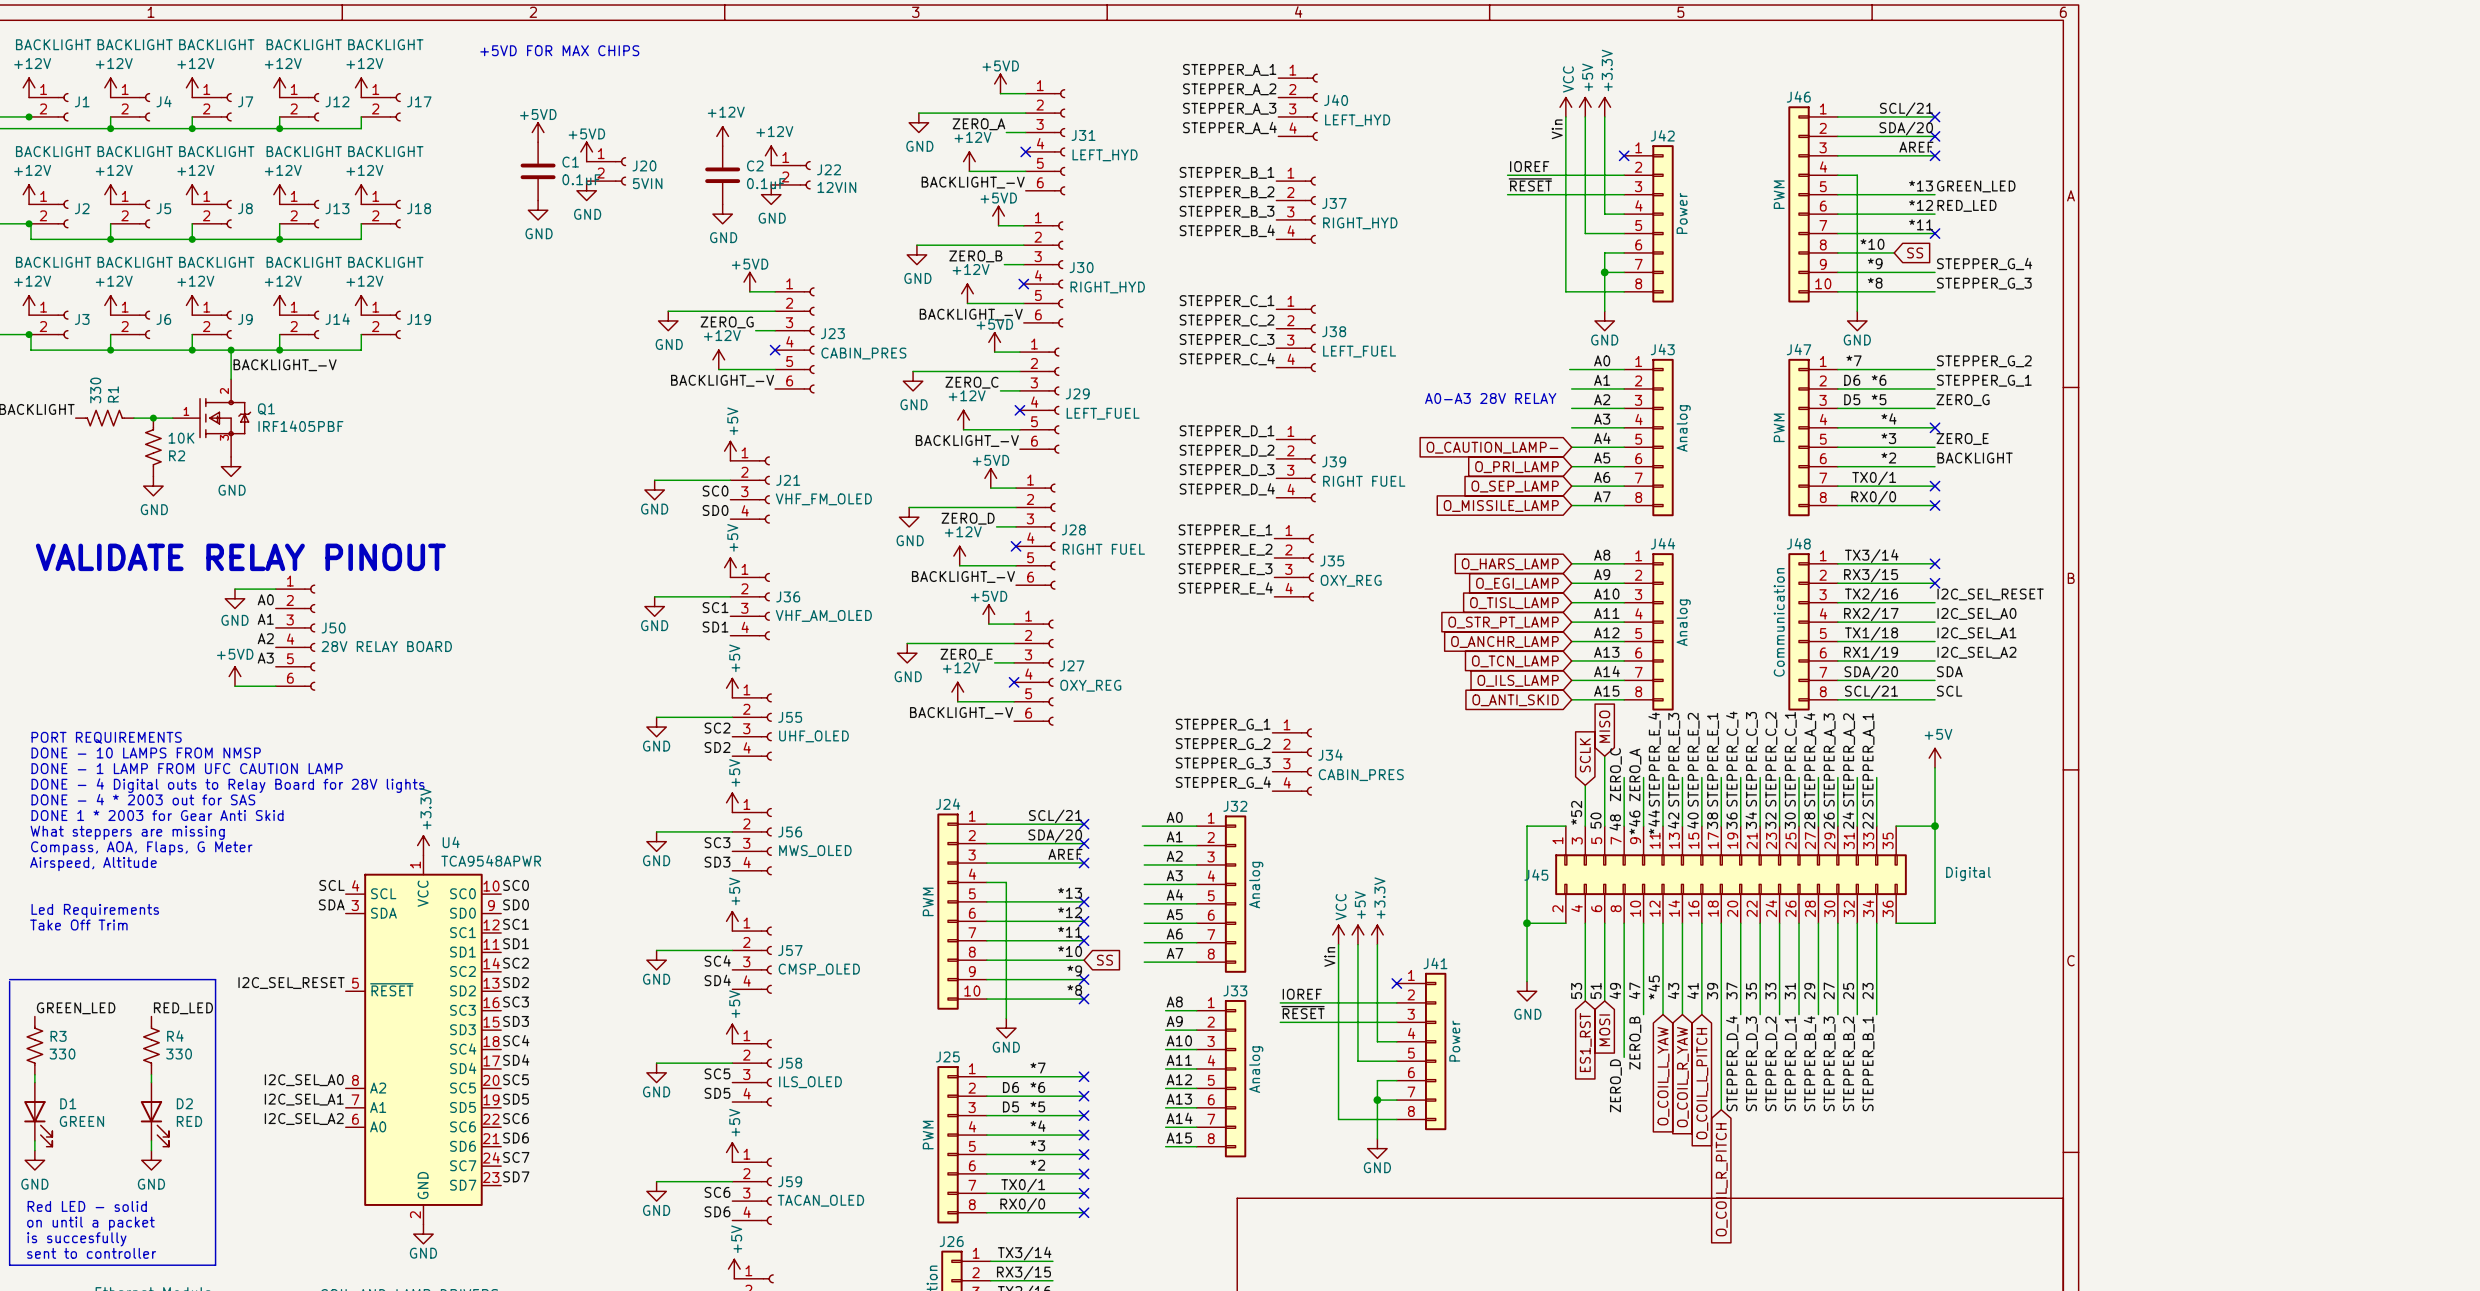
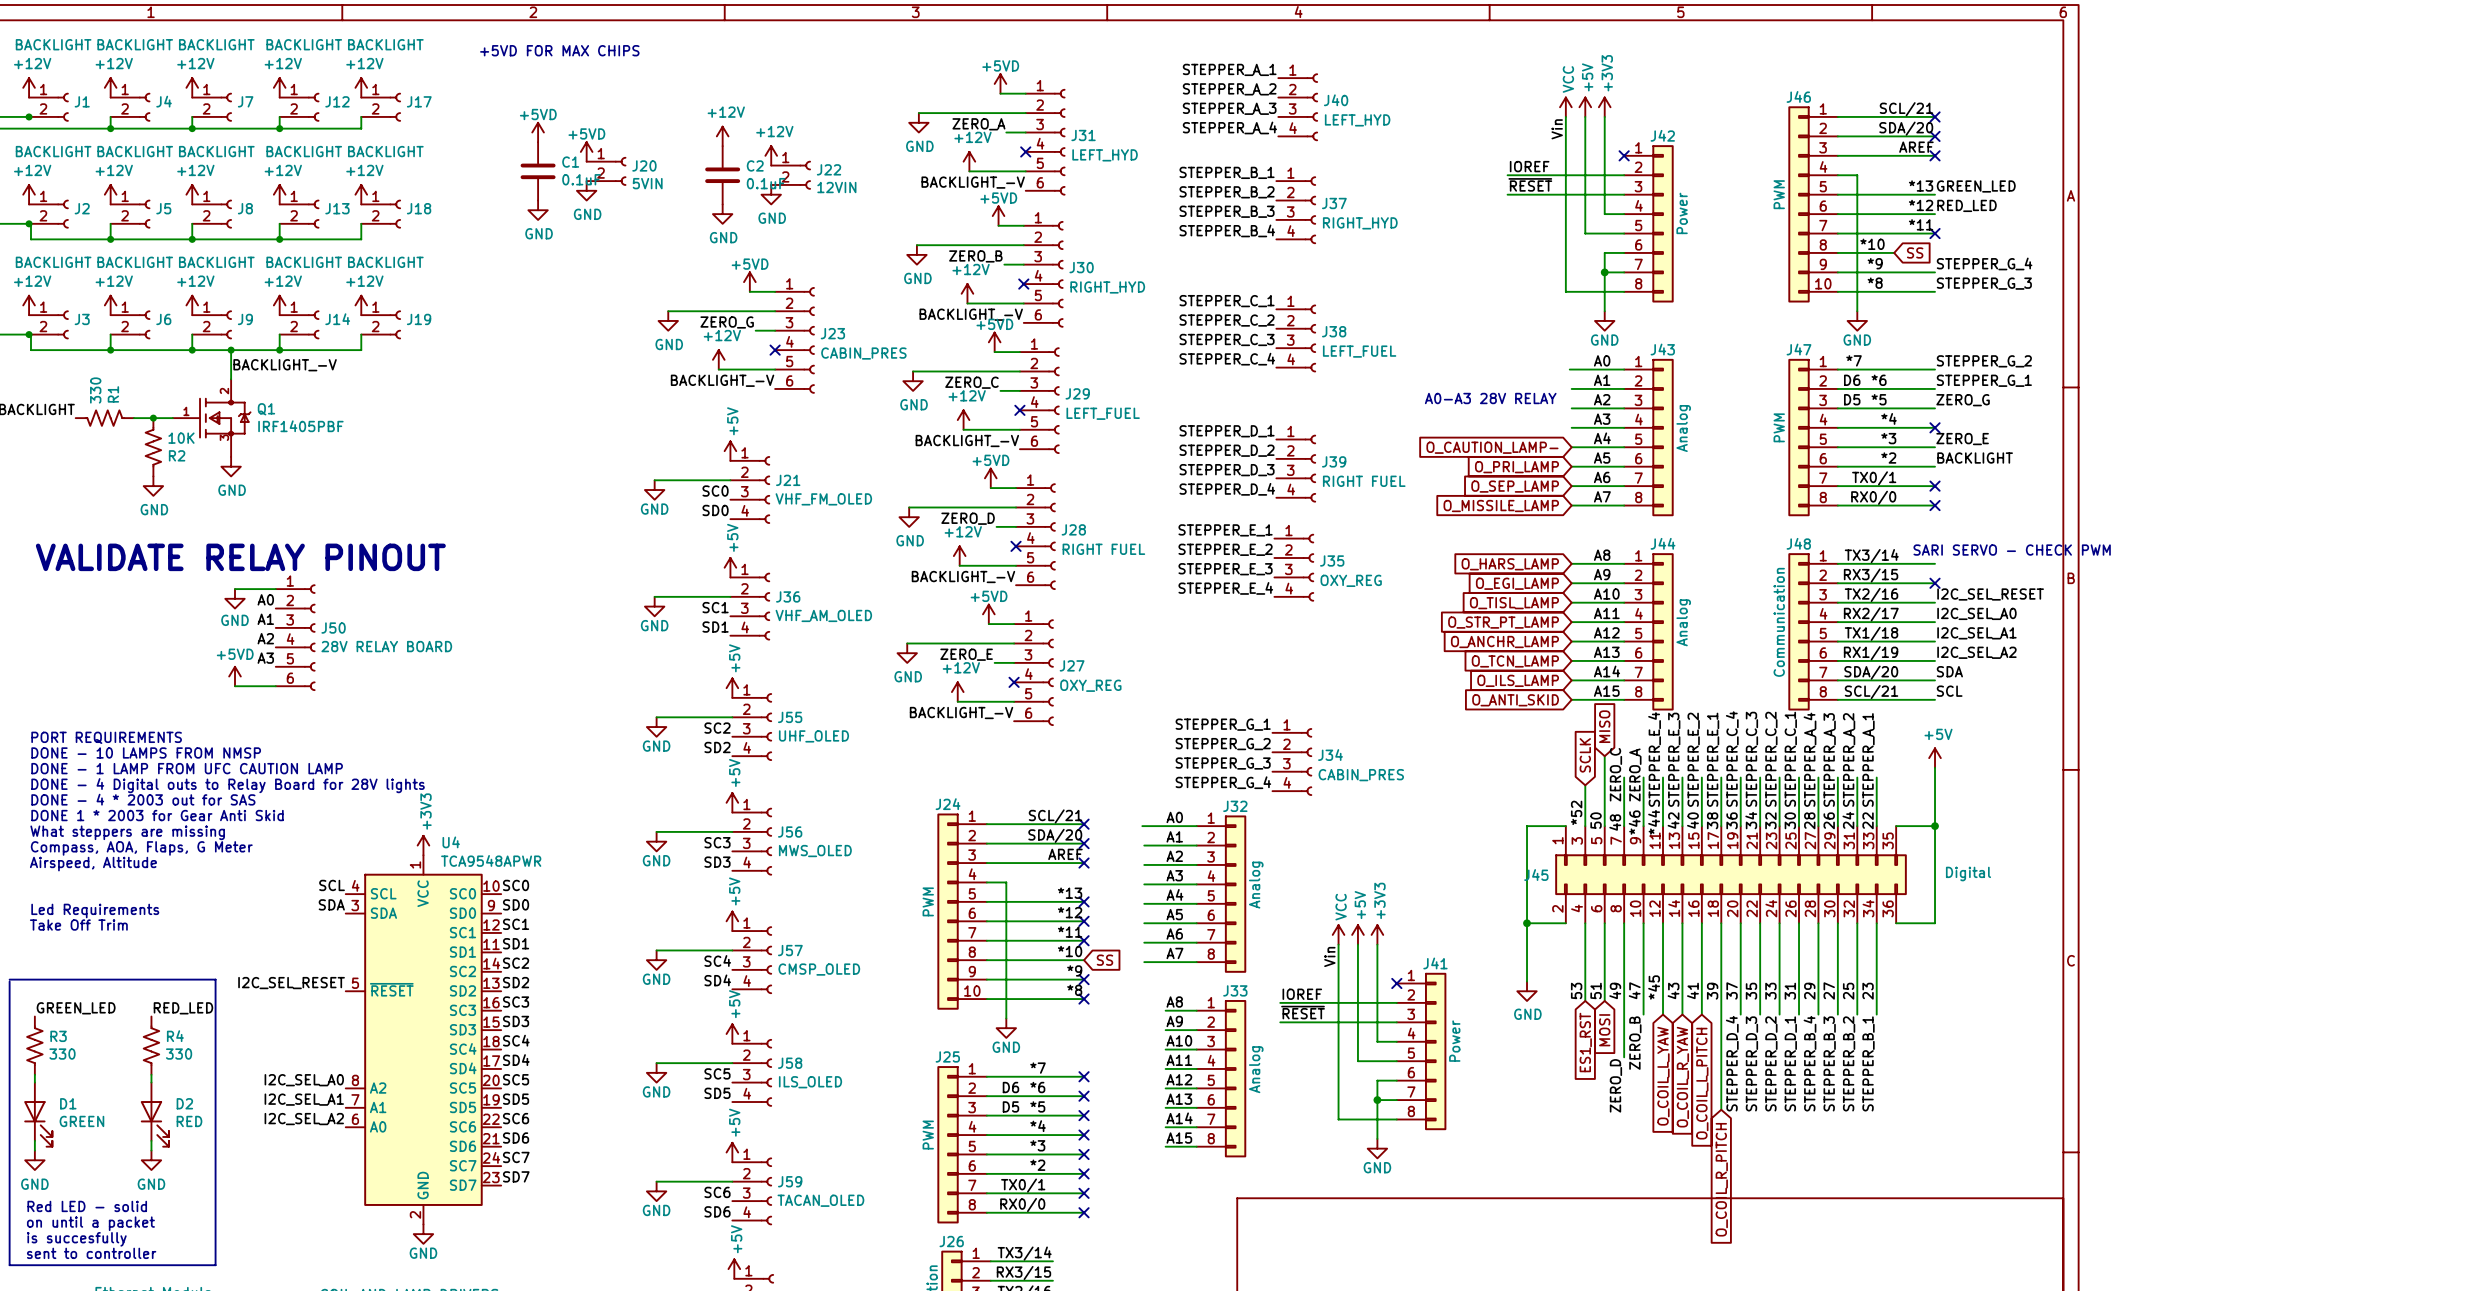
power symbol: +3.3V (1604, 107) -> +3V3 (1604, 107)
text: none -> SARI SERVO - CHECK PWM (2012, 550)
no-connect mark: (1935, 563) -> none
power symbol: +3.3V (423, 845) -> +3V3 (423, 845)
power symbol: +3.3V (1377, 934) -> +3V3 (1377, 934)

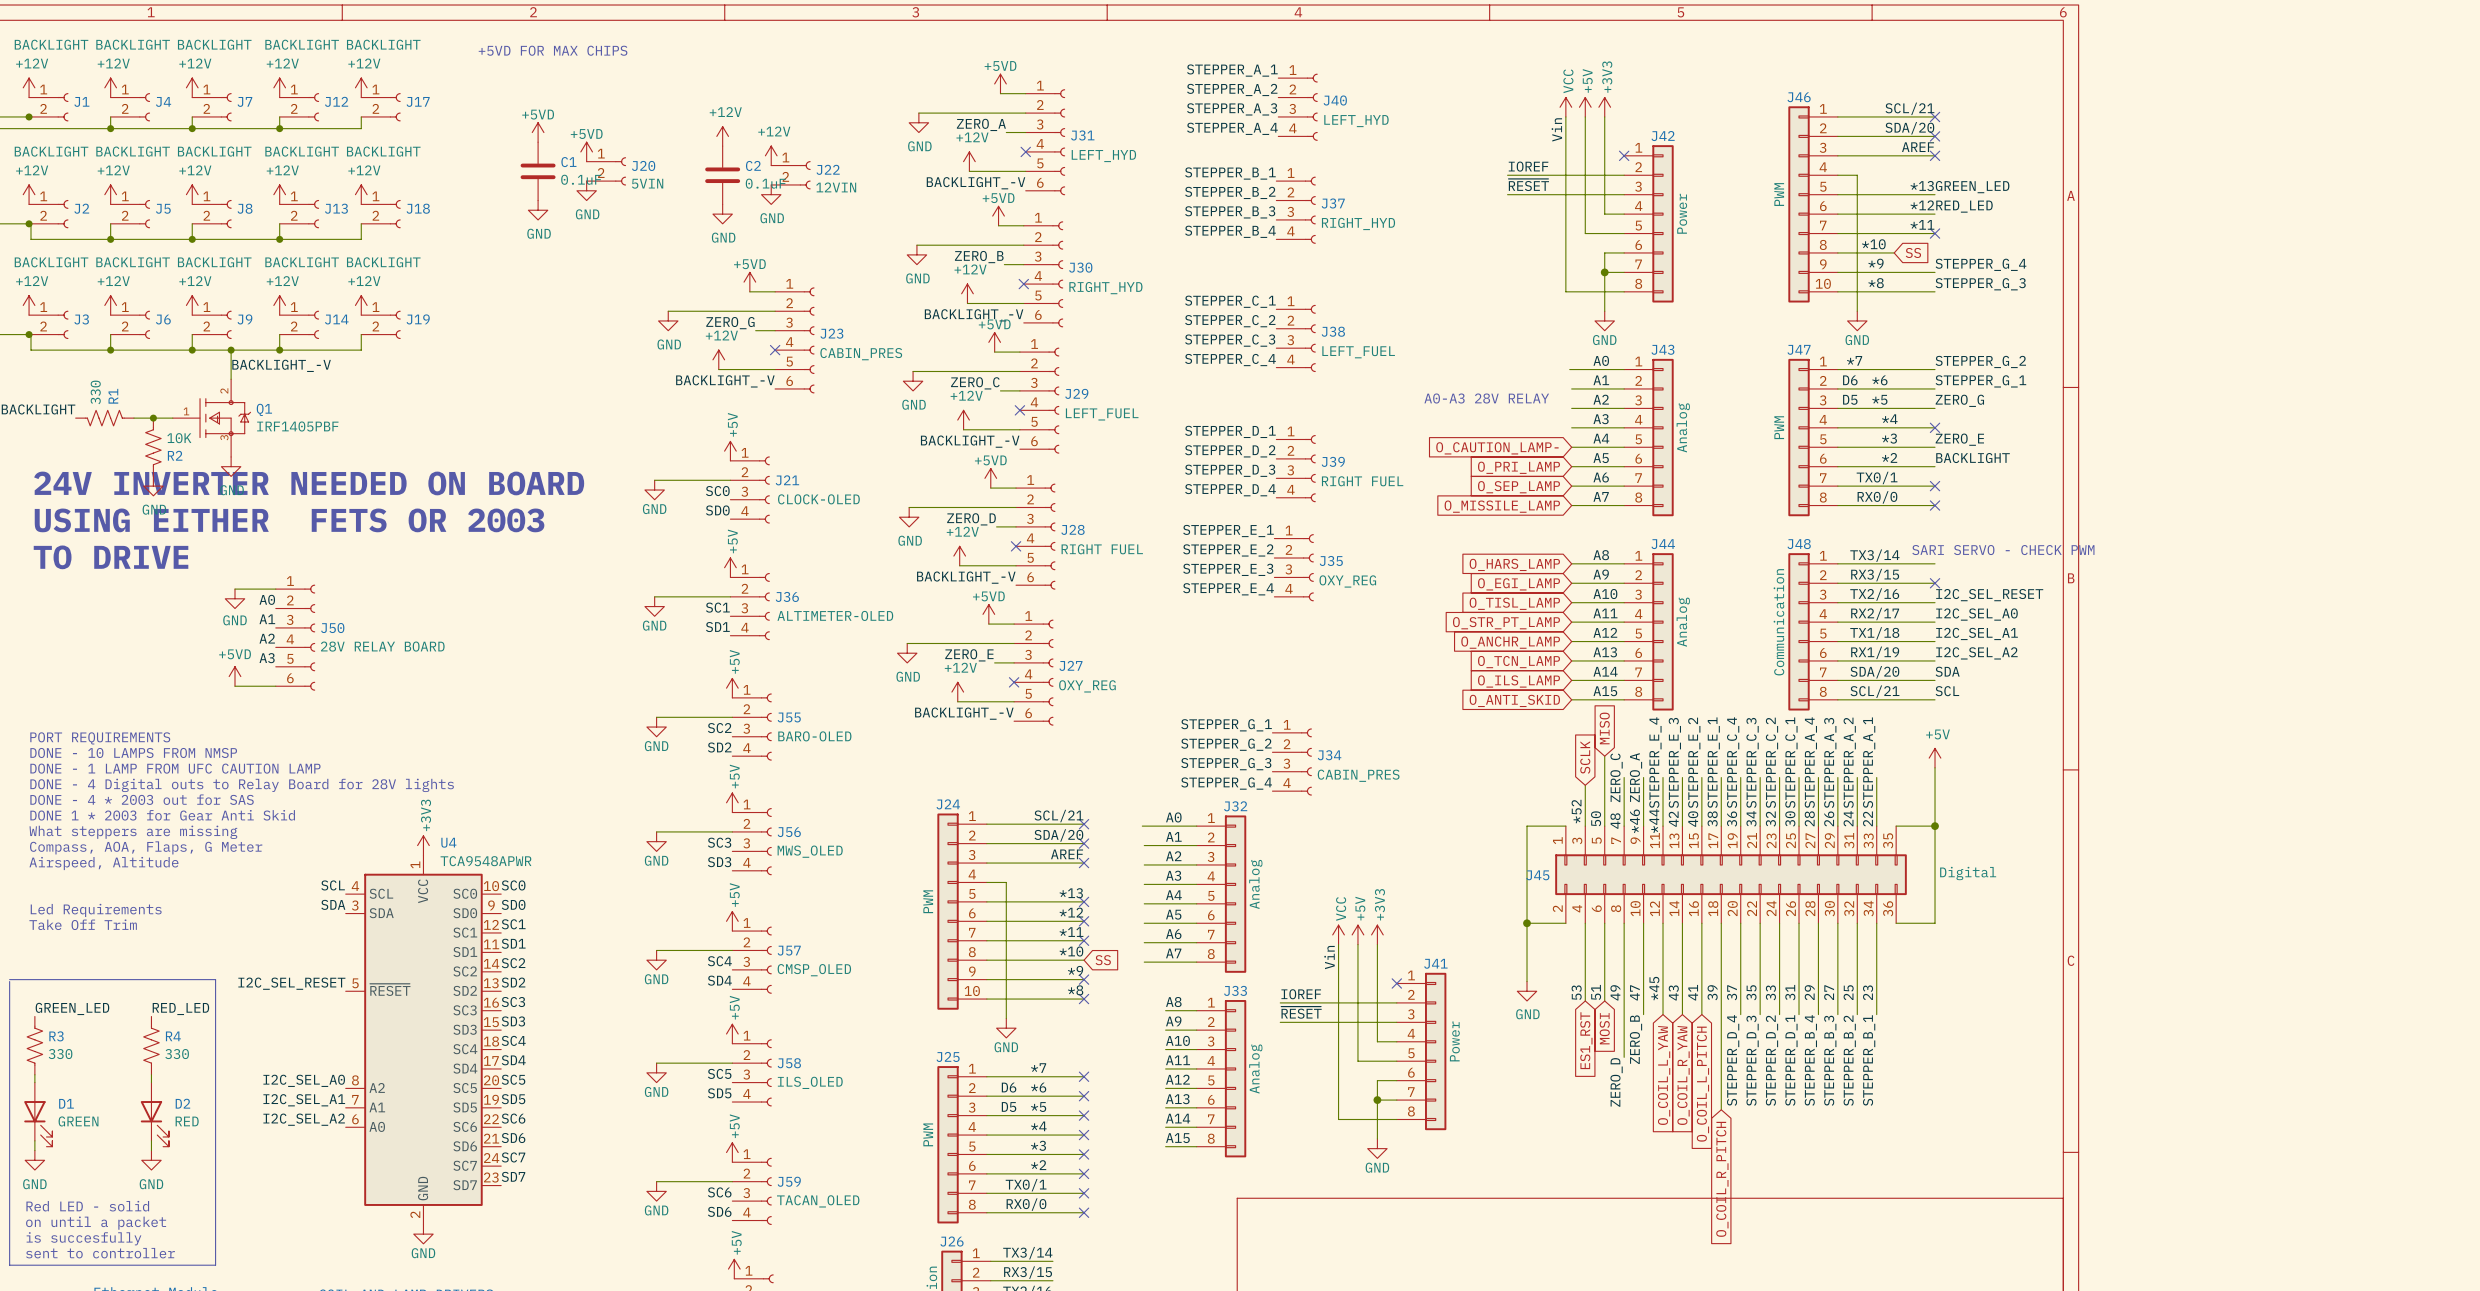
text: none -> 24V INVERTER NEEDED ON BOARD (309, 483)
J21 value: VHF_FM_OLED (823, 499) -> CLOCK-OLED (818, 499)
text: none -> USING EITHER FETS OR 2003 (289, 520)
text: VALIDATE RELAY PINOUT (240, 557) -> TO DRIVE (111, 557)
J36 value: VHF_AM_OLED (823, 615) -> ALTIMETER-OLED (835, 615)
J55 value: UHF_OLED (813, 736) -> BARO-OLED (814, 736)

